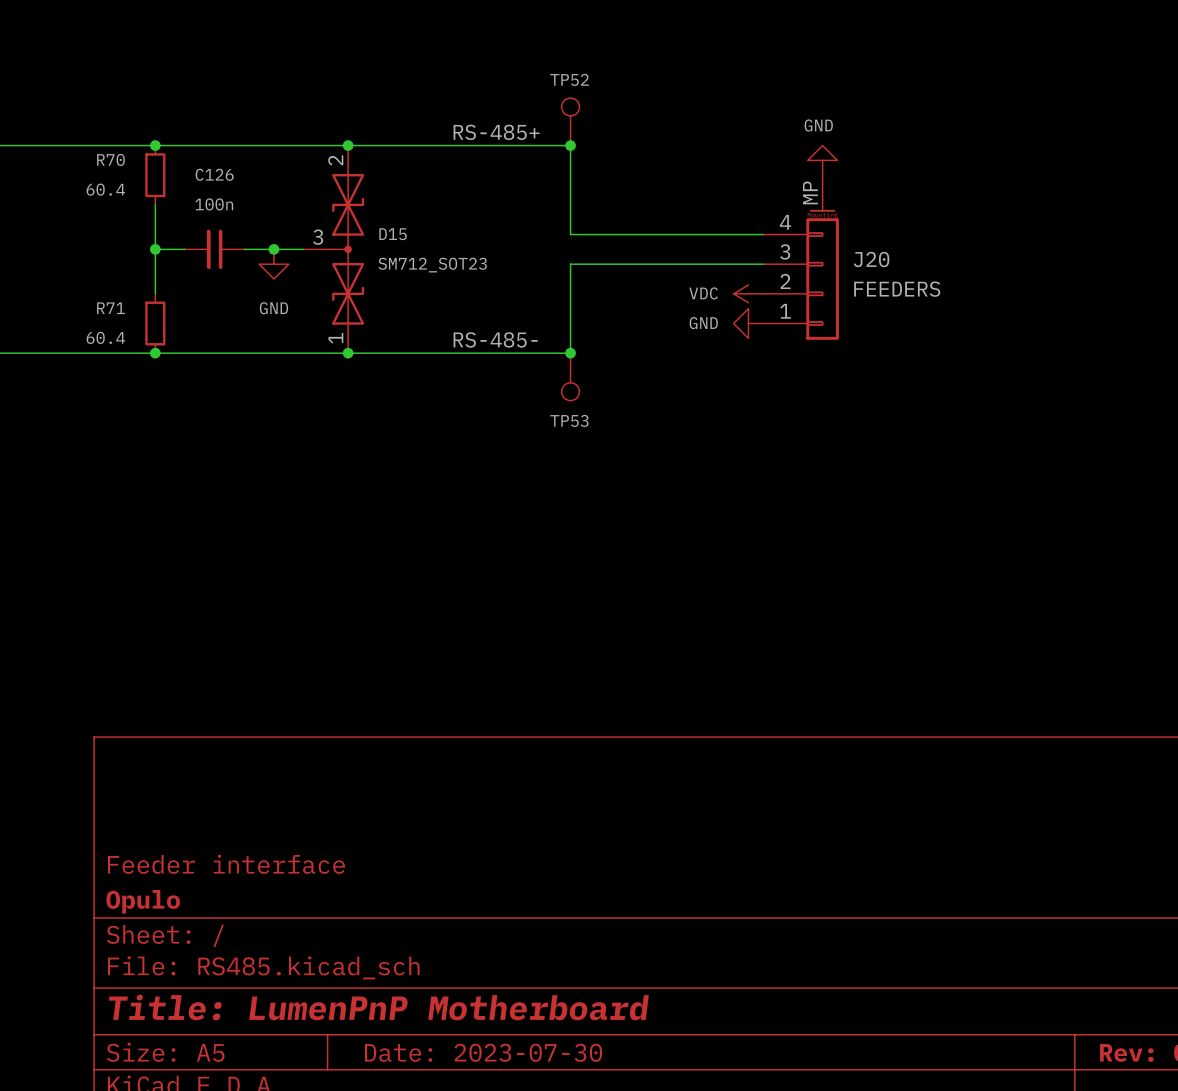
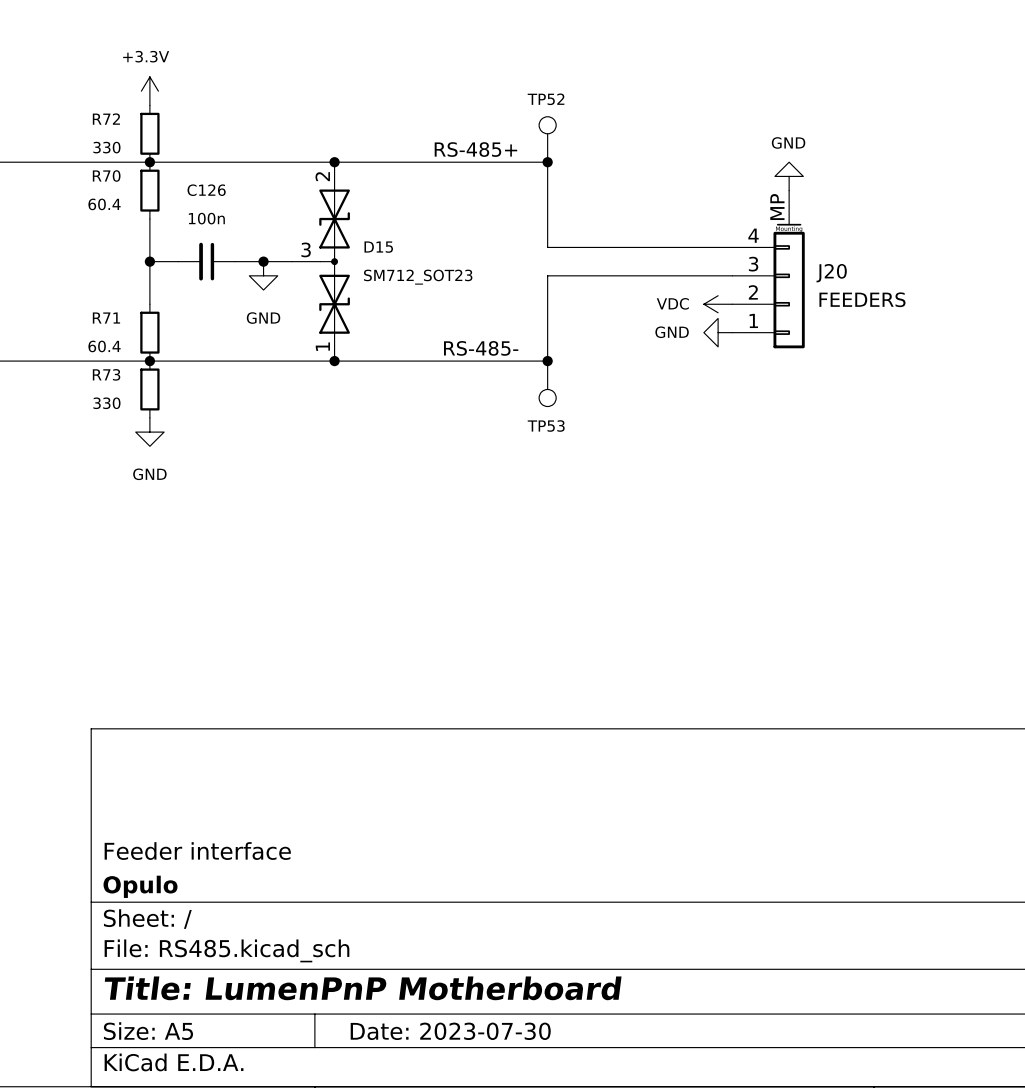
power symbol: none -> +3.3V (149, 91)
R72: none -> 330 (149, 133)
R73: none -> 330 (149, 389)
power symbol: none -> GND (149, 432)

